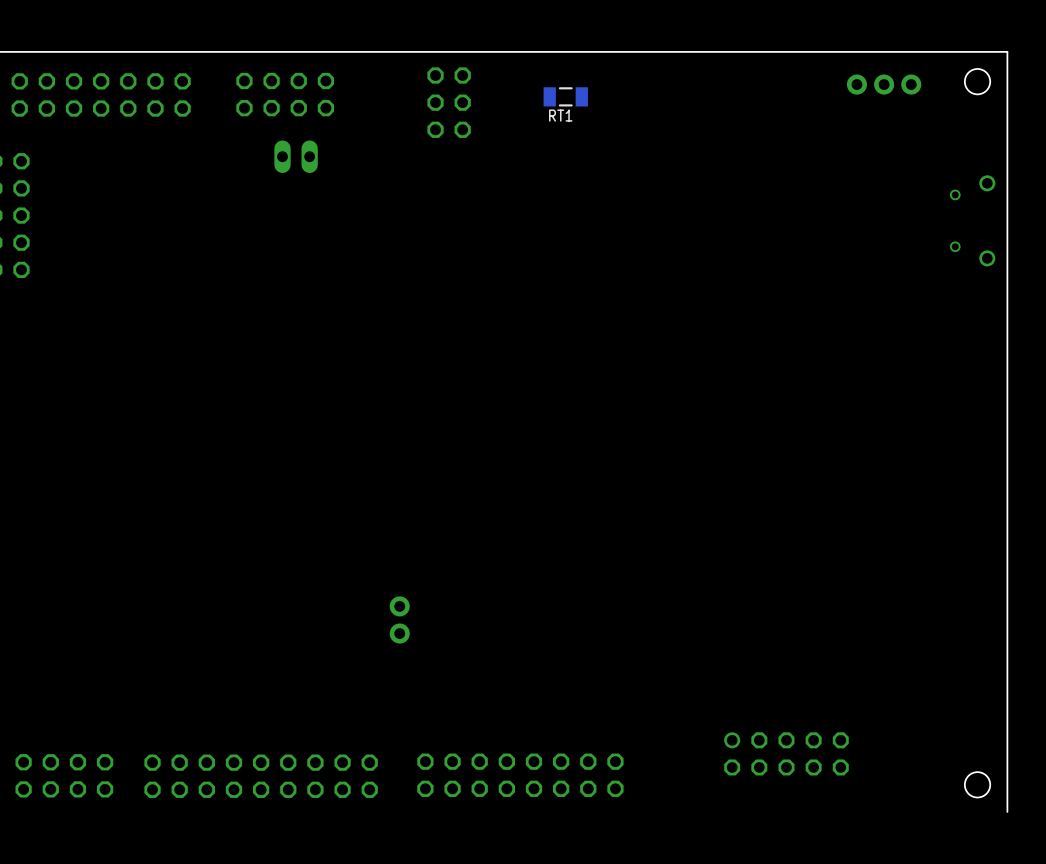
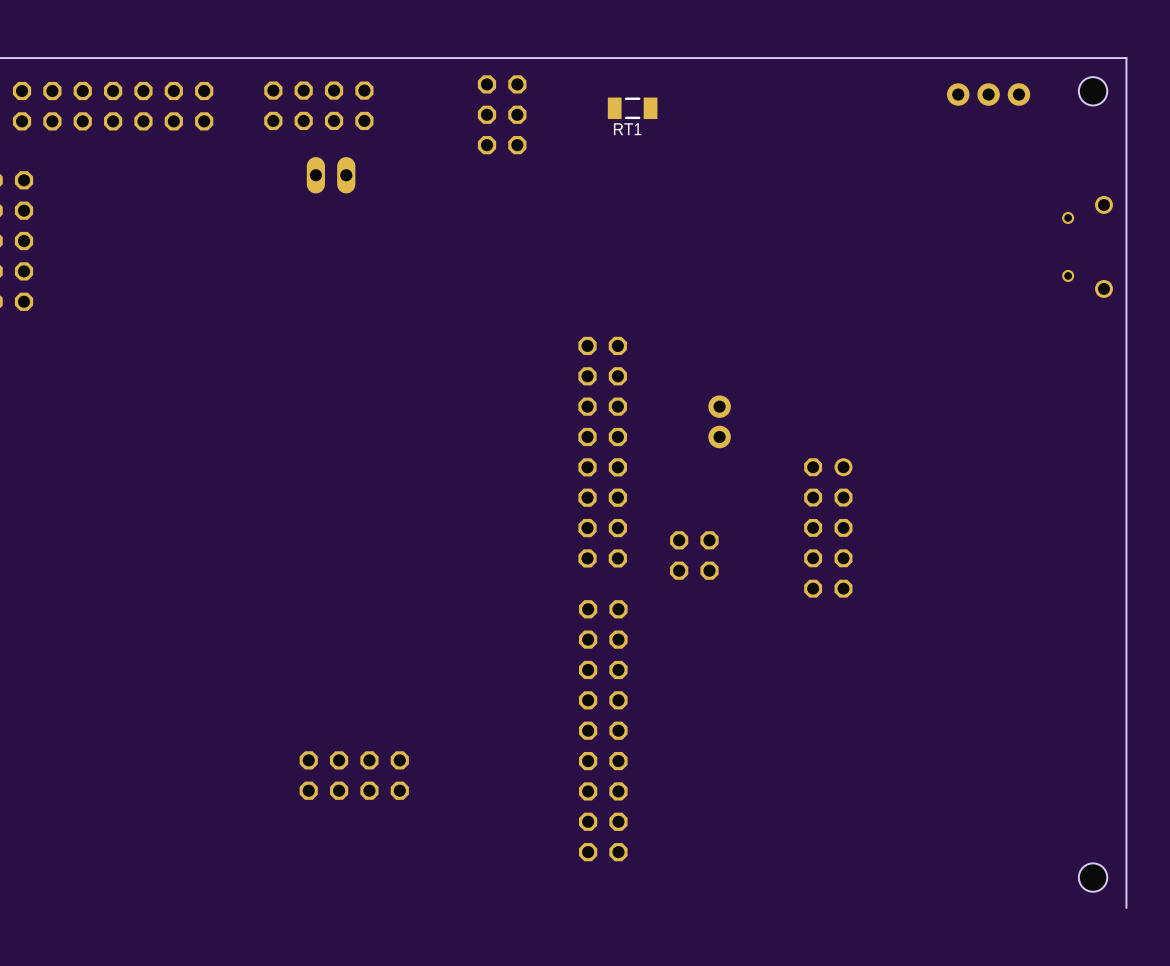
part: none -> (719, 421)
part: none -> (602, 452)
part: none -> (828, 527)
part: none -> (694, 555)
part: (399, 619) -> none
part: none -> (603, 730)
part: (786, 753) -> none
part position: (64, 775) -> (354, 775)
part: (520, 775) -> none
part: (261, 776) -> none

